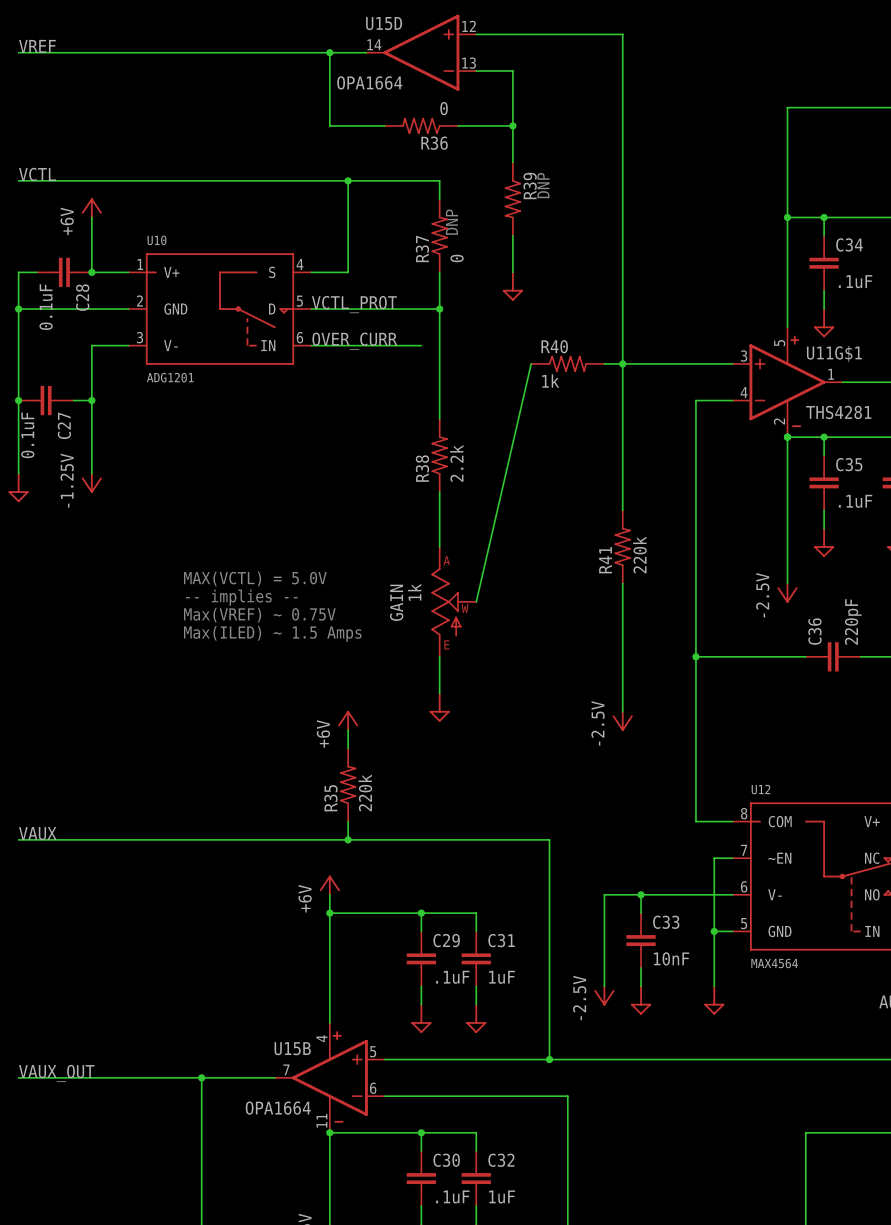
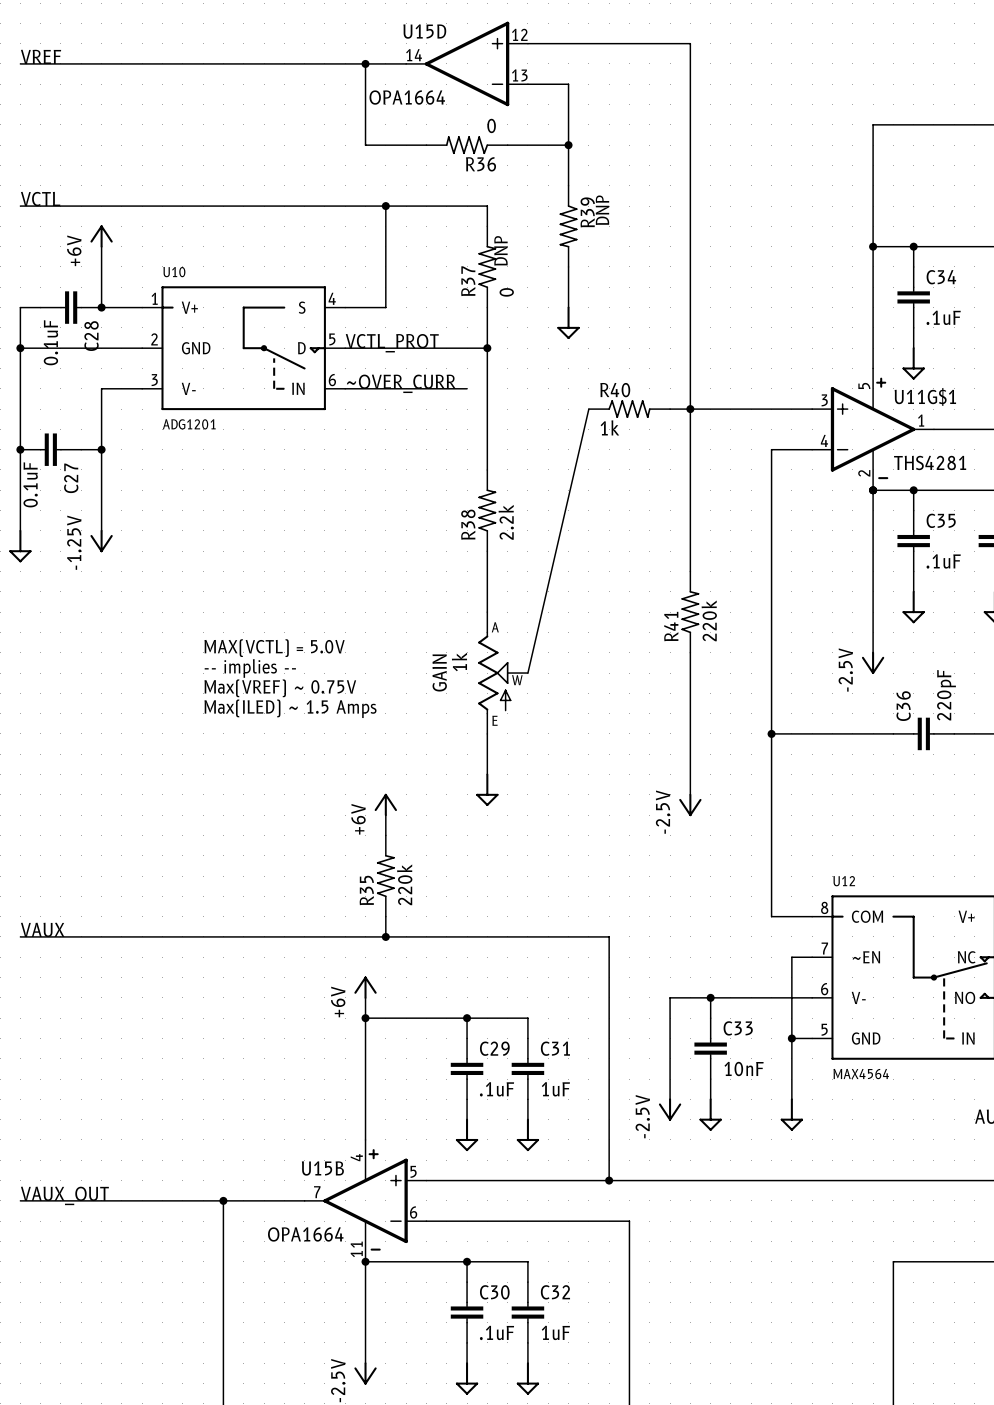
label: OVER_CURR (354, 341) -> ~OVER_CURR (401, 383)

